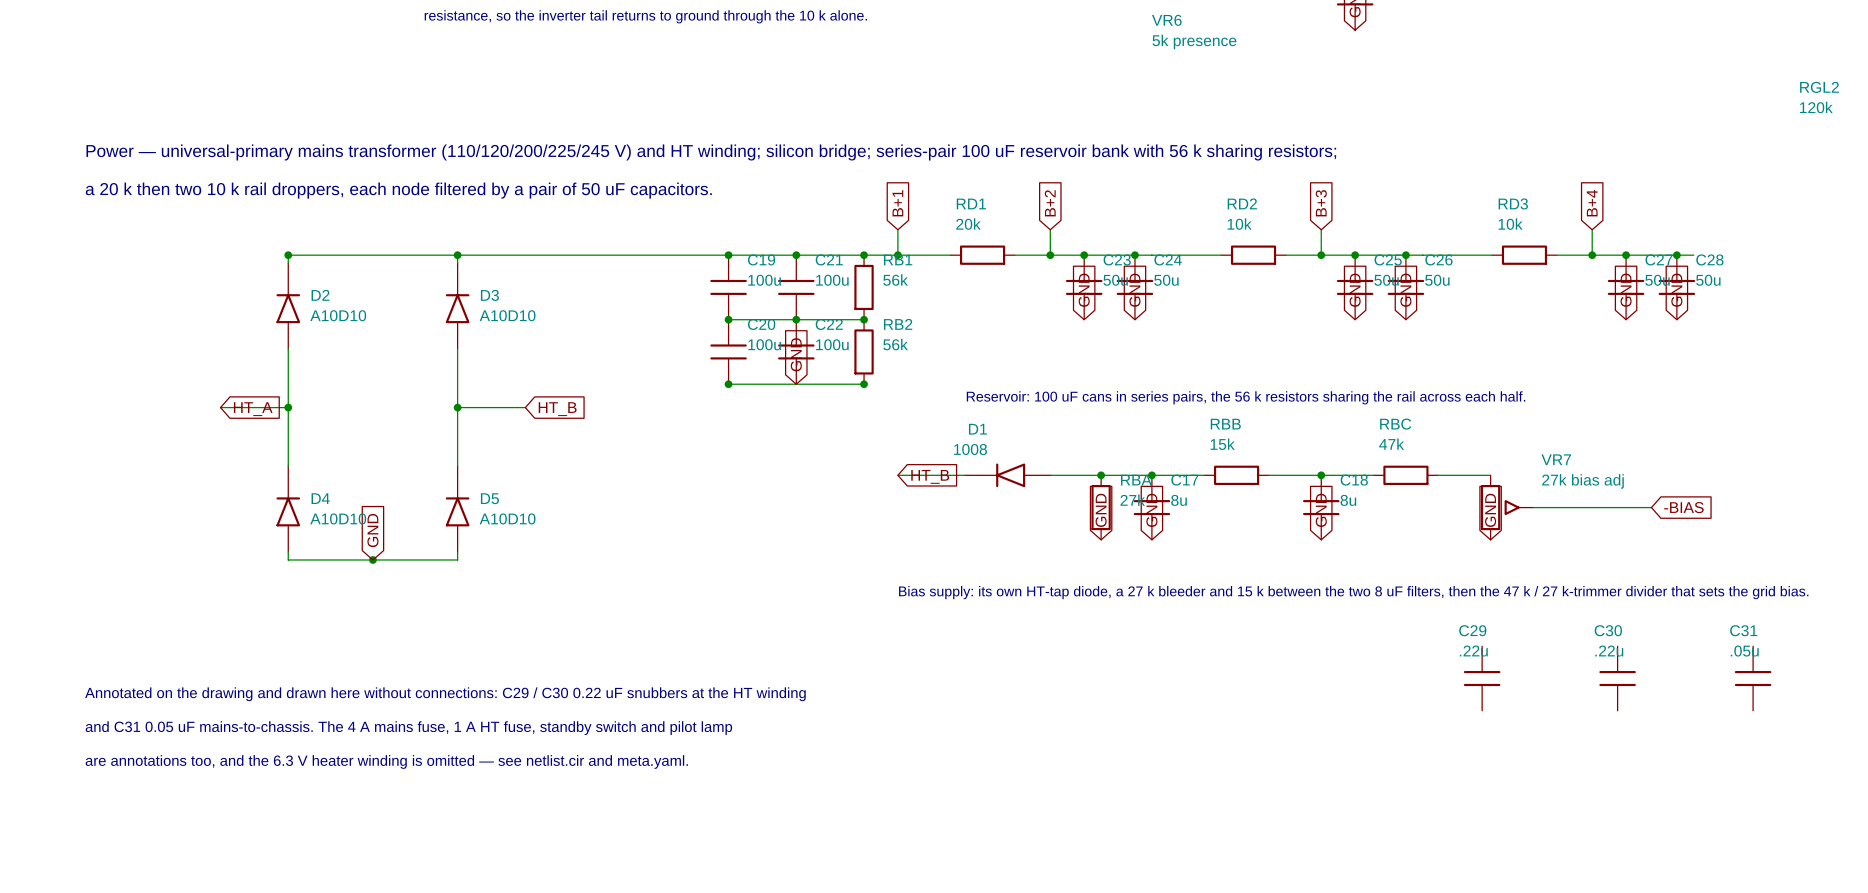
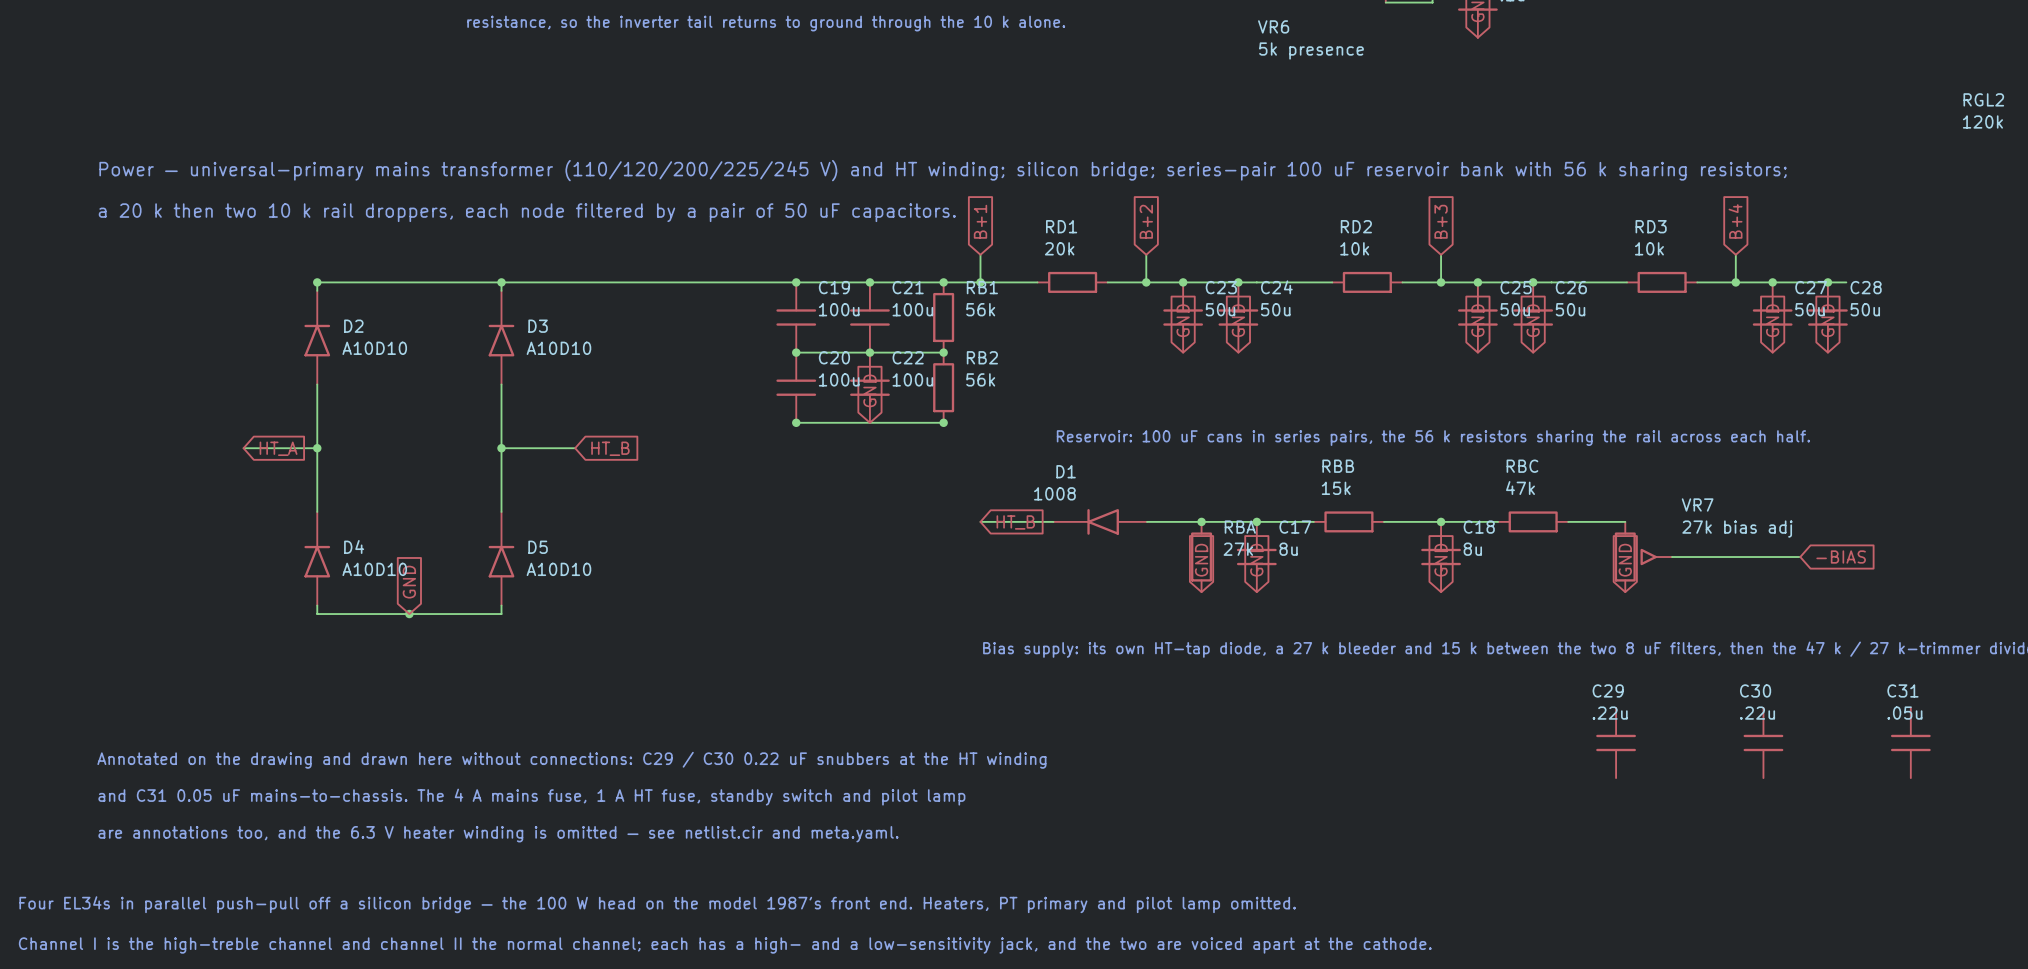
text: none -> Four EL34s in parallel push-pull off a silicon bridge — the 100 W head on the model 1987's front end. Heaters, PT primary and pilot lamp omitted. (657, 904)
text: none -> Channel I is the high-treble channel and channel II the normal channel; each has a high- and a low-sensitivity jack, and the two are voiced apart at the cathode. (725, 945)

